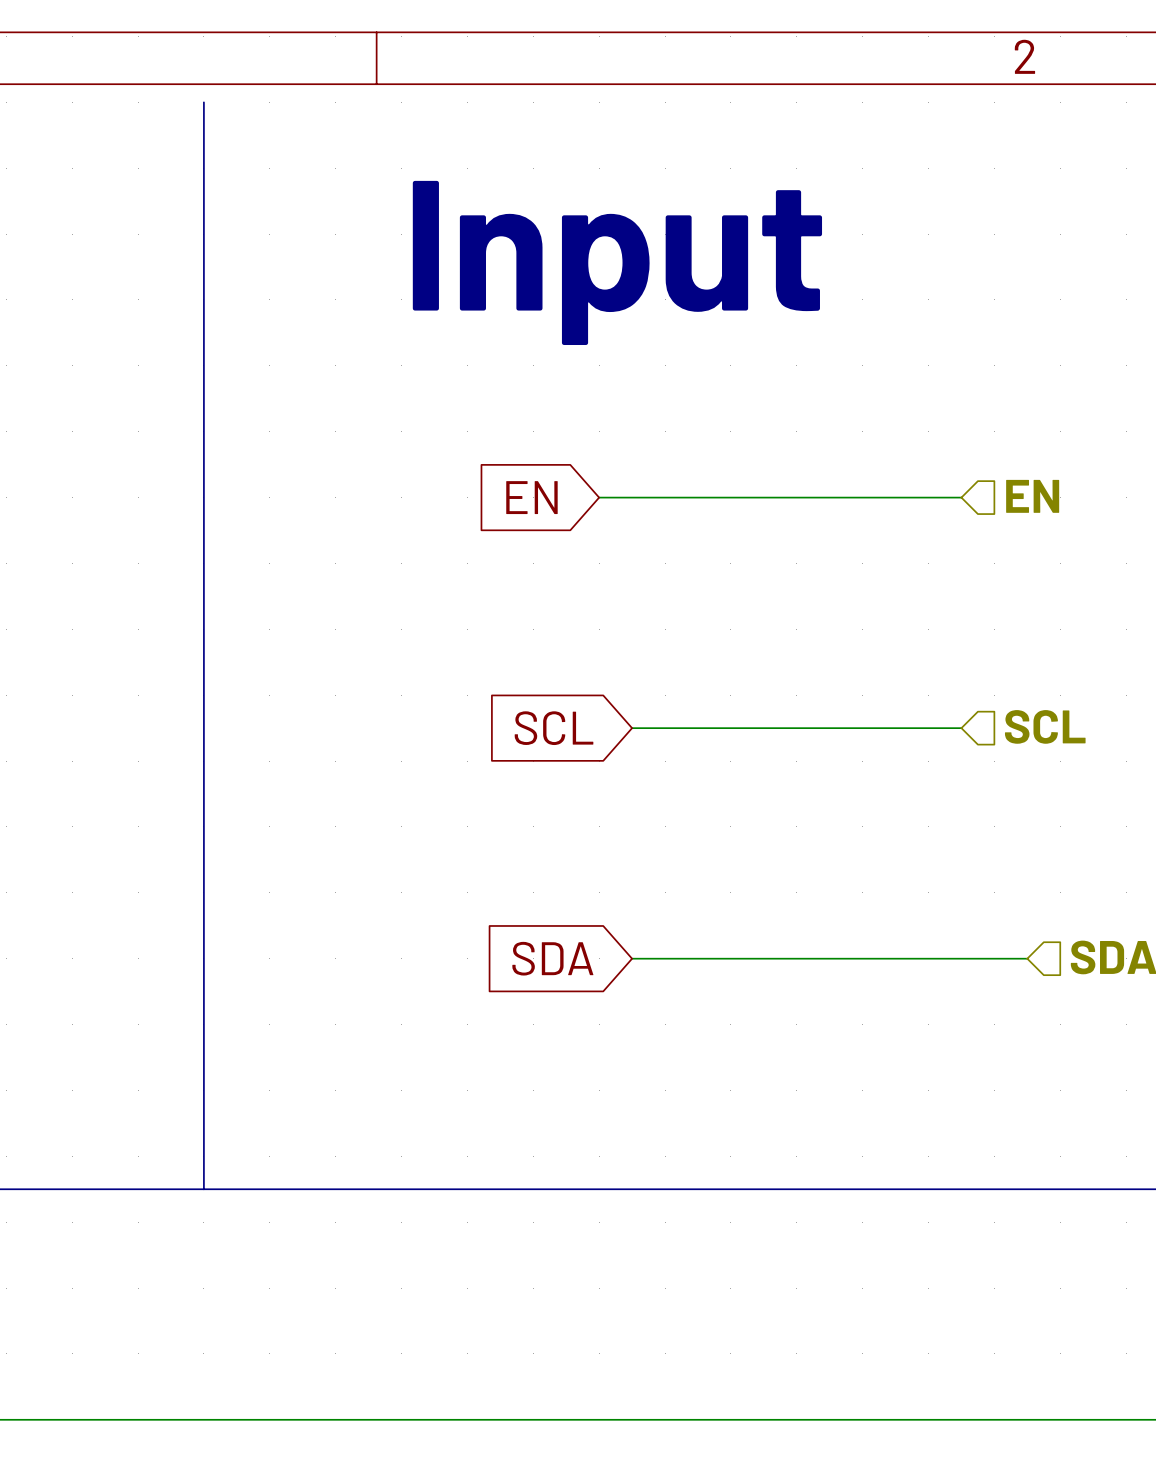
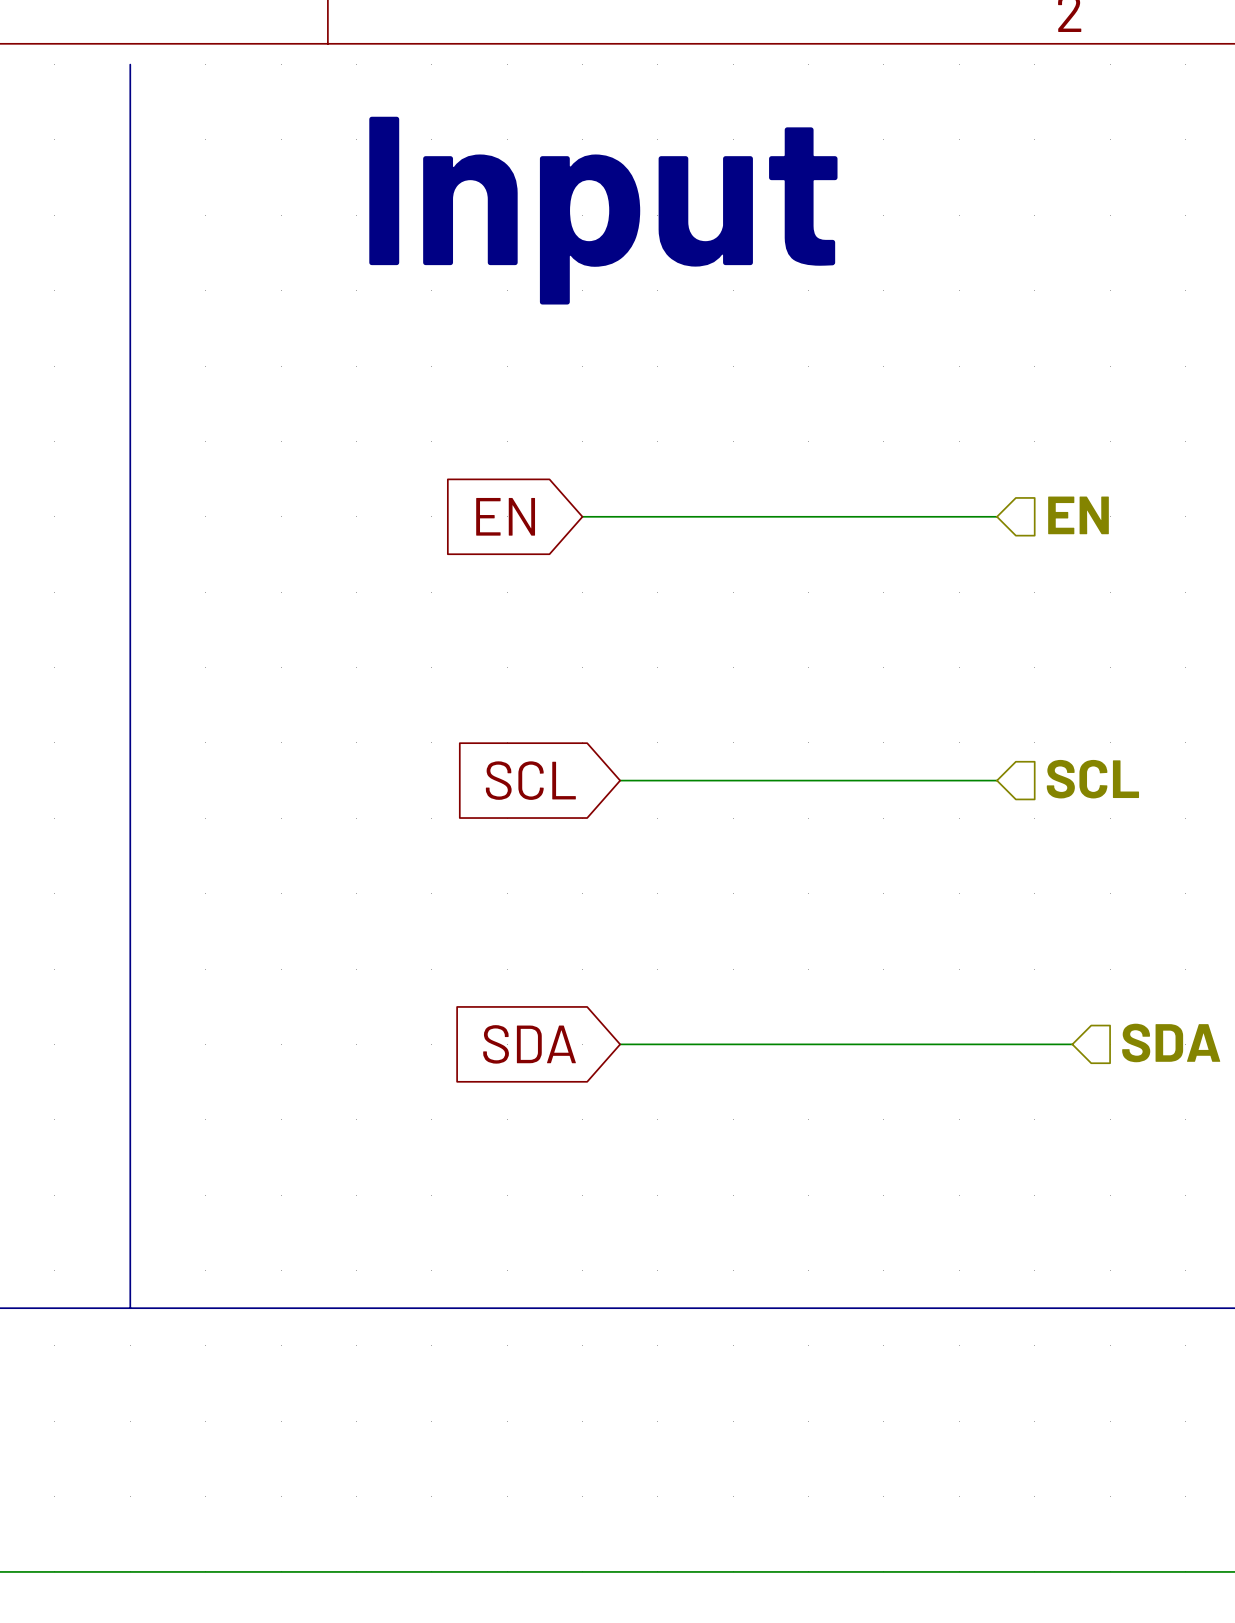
text position: Input (617, 262) -> Input (603, 210)

